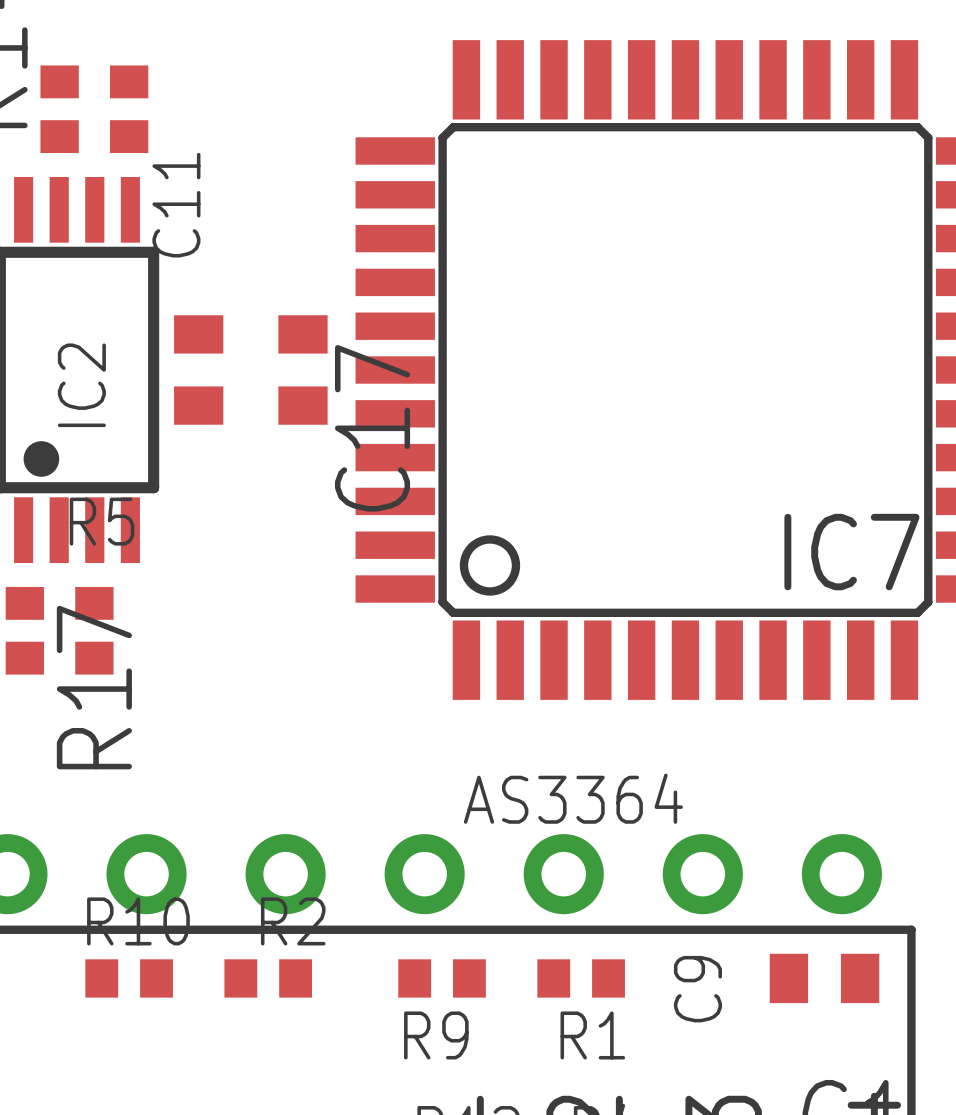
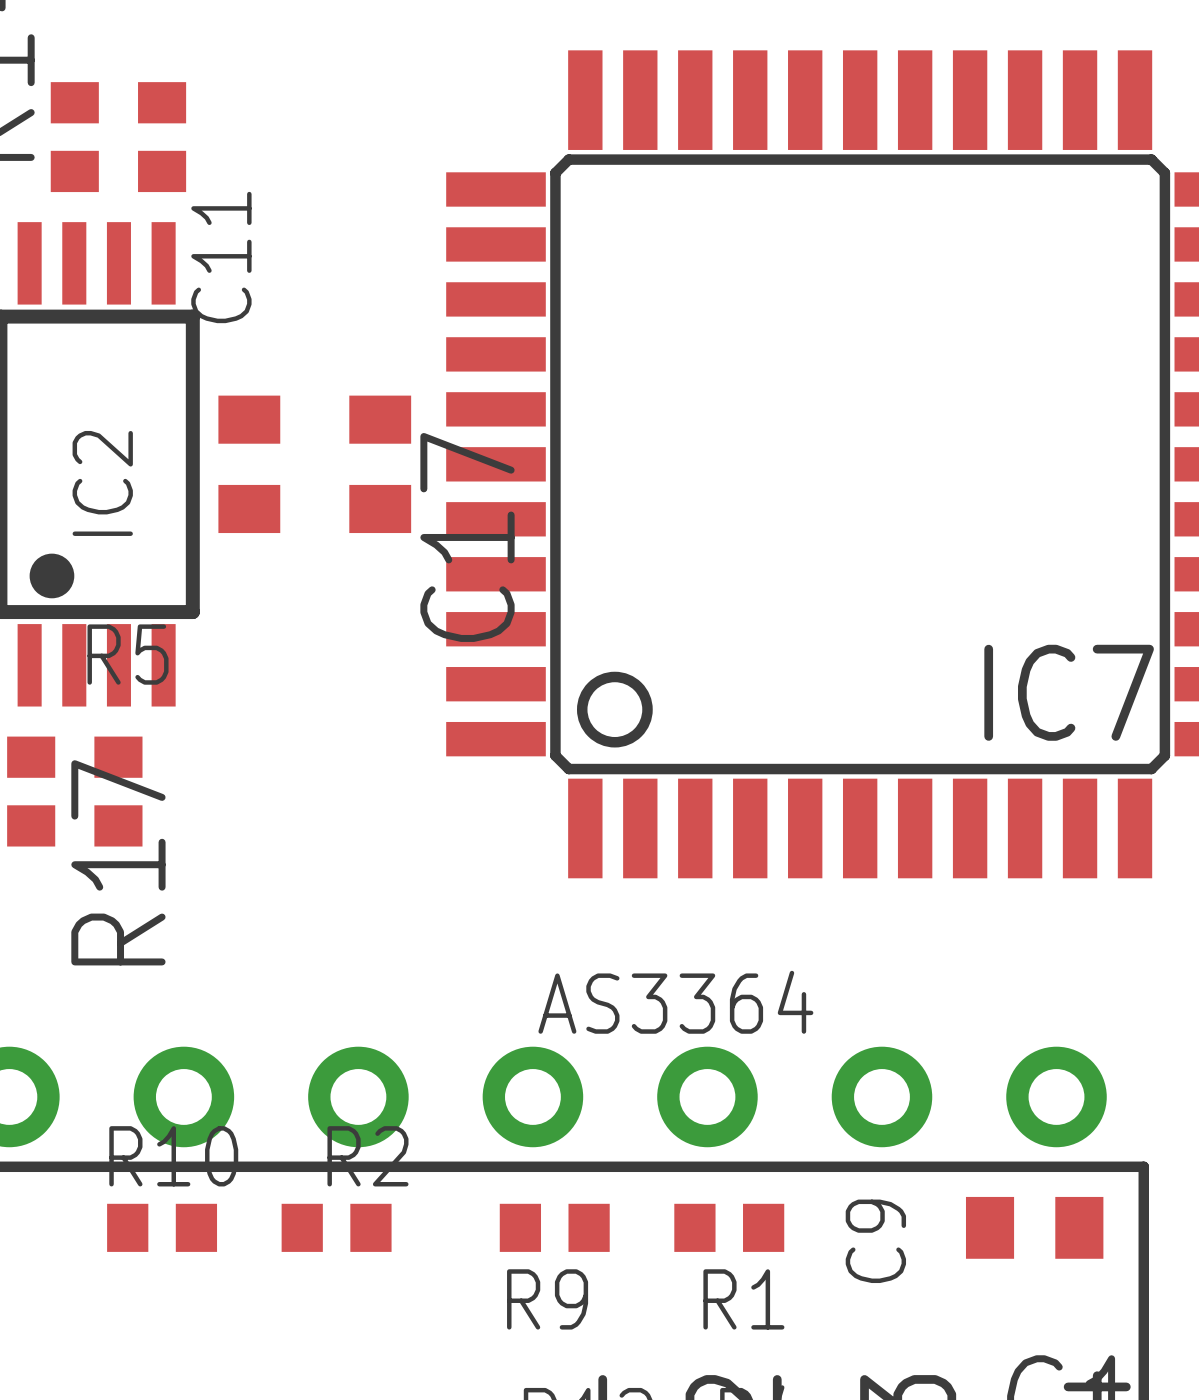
text position: AS3364 (573, 798) -> AS3364 (675, 1002)

